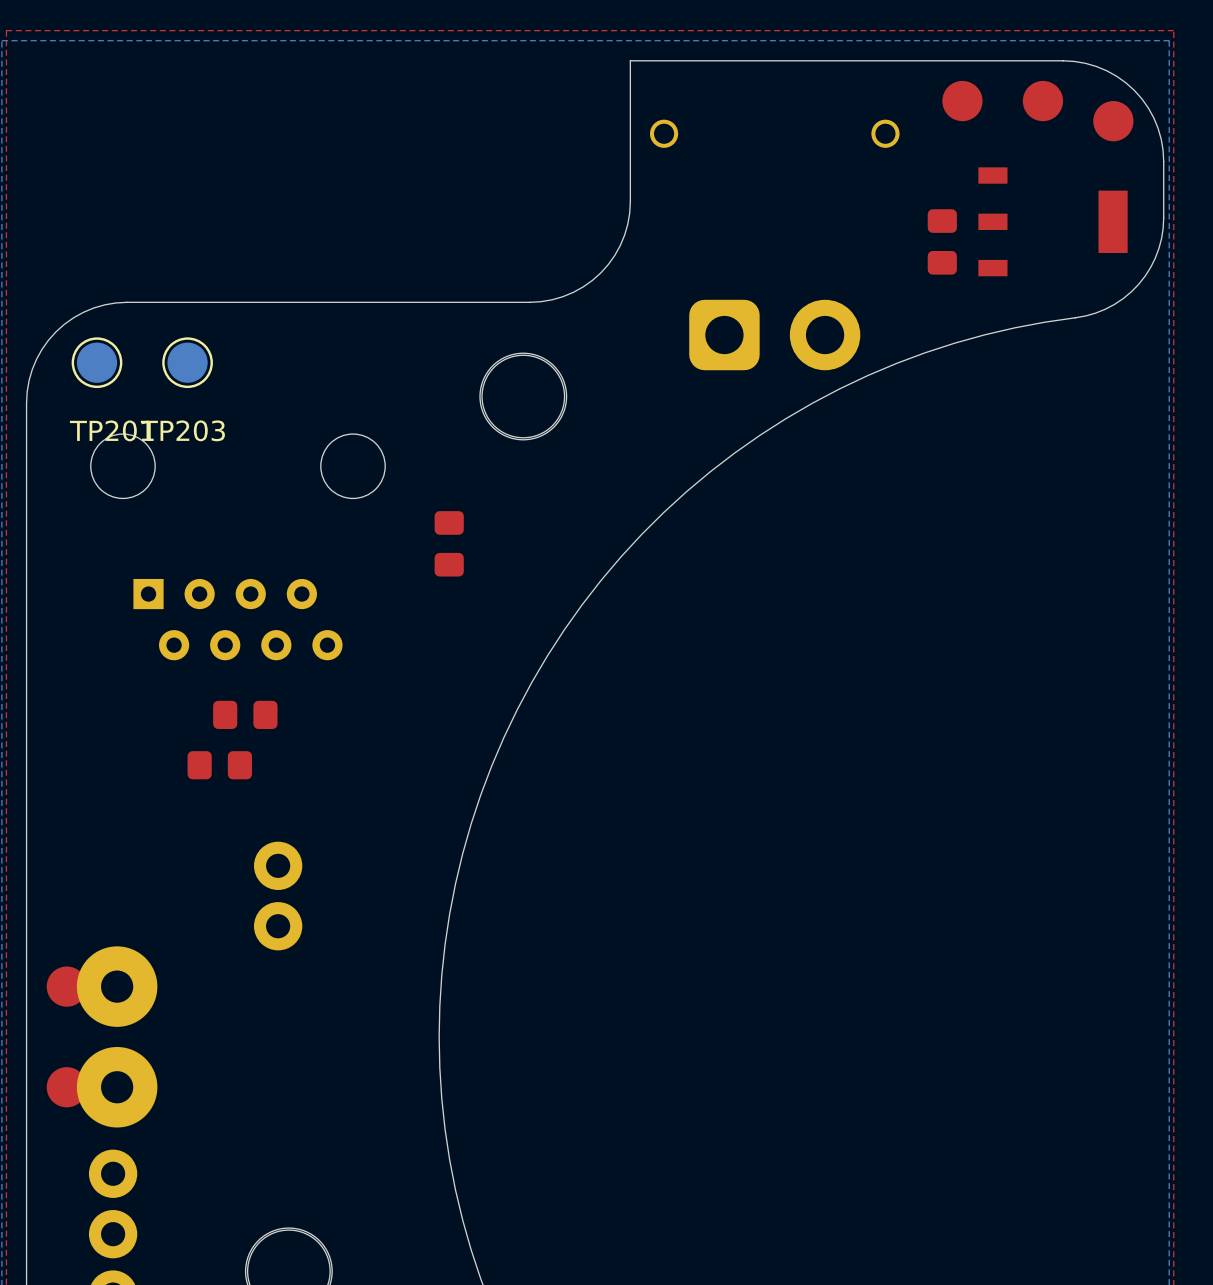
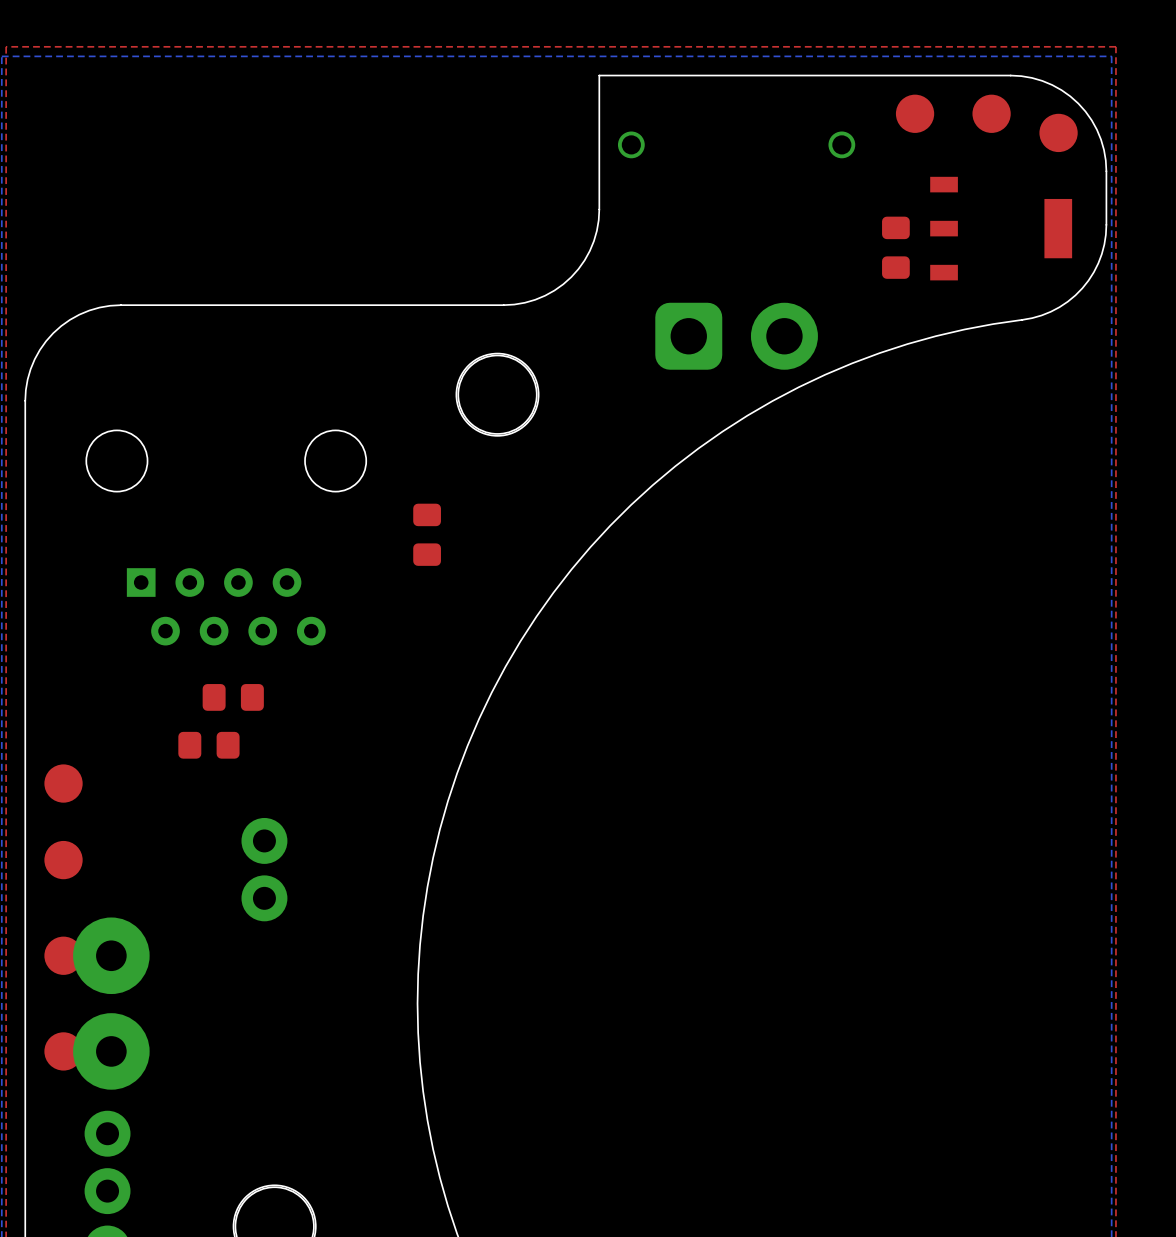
TP201 side: bottom (97, 362) -> top (63, 783)
TP203: (187, 362) -> none
part: none -> (63, 860)

